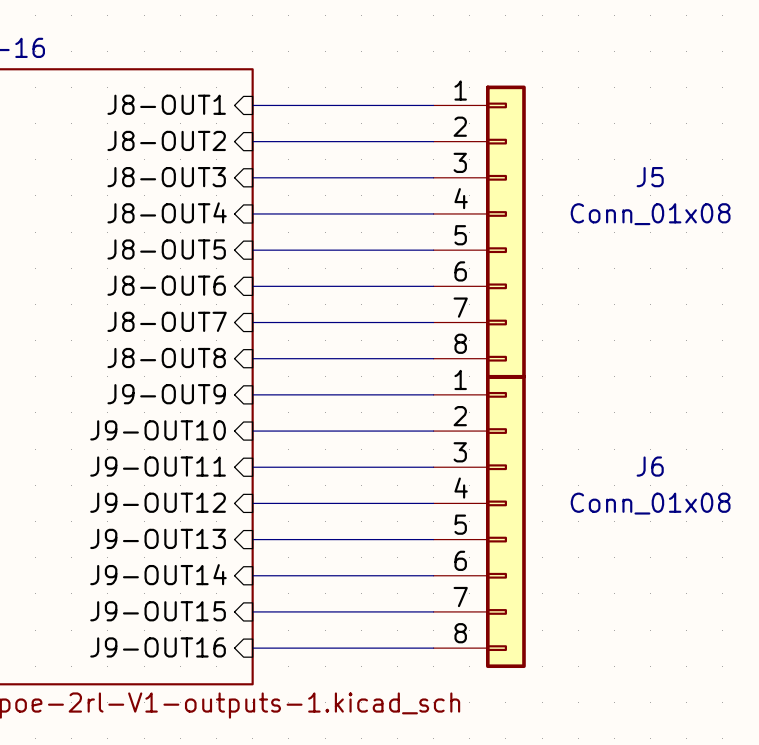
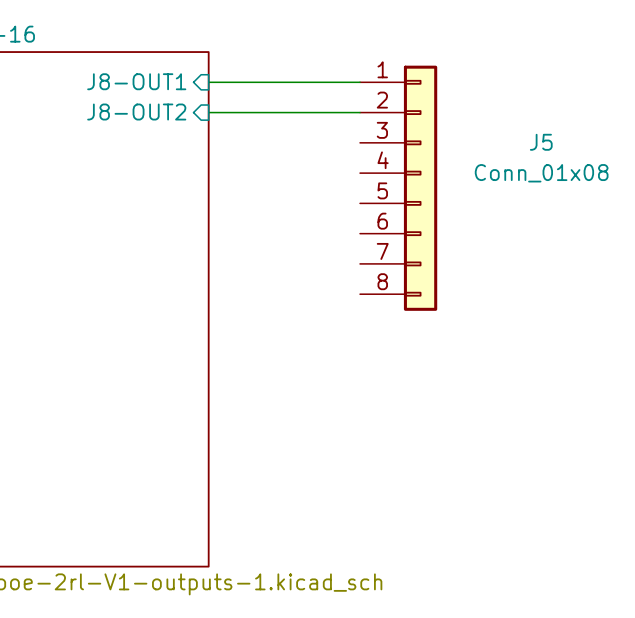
sheet pin: J8-OUT3 (166, 177) -> none
wire: (252, 177) (433, 177) -> none
sheet pin: J8-OUT4 (167, 212) -> none
wire: (252, 213) (433, 213) -> none
sheet pin: J8-OUT5 (166, 249) -> none
wire: (252, 250) (433, 250) -> none
sheet pin: J8-OUT6 (166, 285) -> none
wire: (252, 286) (433, 286) -> none
sheet pin: J8-OUT7 (167, 321) -> none
wire: (252, 322) (433, 322) -> none
sheet pin: J8-OUT8 (166, 358) -> none
wire: (252, 358) (433, 358) -> none
sheet pin: J9-OUT9 (166, 394) -> none
wire: (252, 394) (433, 394) -> none
sheet pin: J9-OUT10 (158, 430) -> none
wire: (252, 431) (433, 431) -> none
sheet pin: J9-OUT11 (158, 466) -> none
wire: (252, 467) (433, 467) -> none
sheet pin: J9-OUT12 (158, 502) -> none
wire: (252, 503) (433, 503) -> none
J6: Conn_01x08 (479, 521) -> none
sheet pin: J9-OUT13 (158, 538) -> none
wire: (252, 539) (433, 539) -> none
sheet pin: J9-OUT14 (158, 574) -> none
wire: (252, 575) (433, 575) -> none
sheet pin: J9-OUT15 (158, 611) -> none
wire: (252, 611) (433, 611) -> none
sheet pin: J9-OUT16 (158, 647) -> none
wire: (252, 648) (433, 648) -> none

